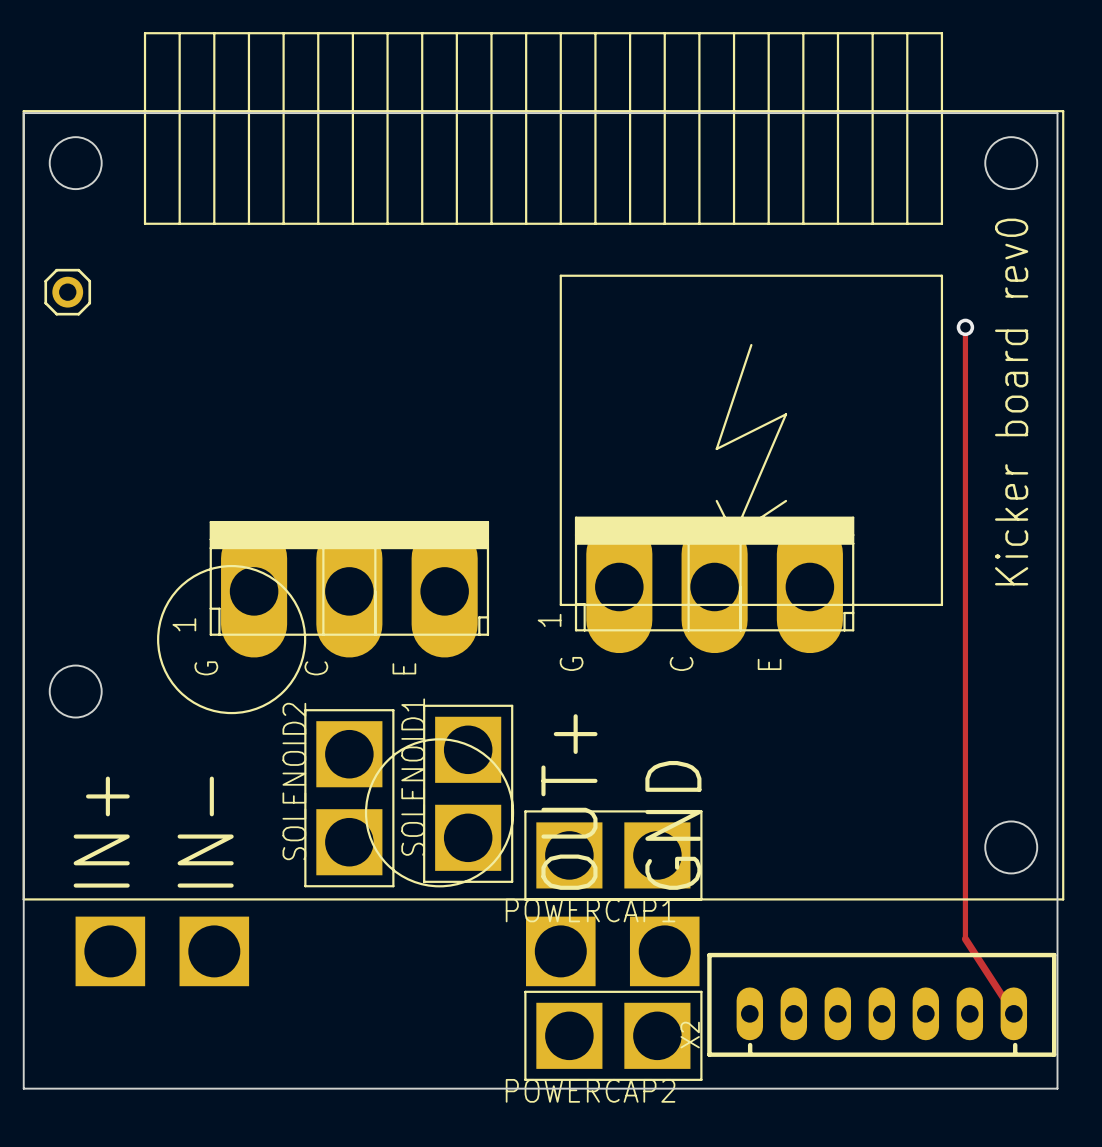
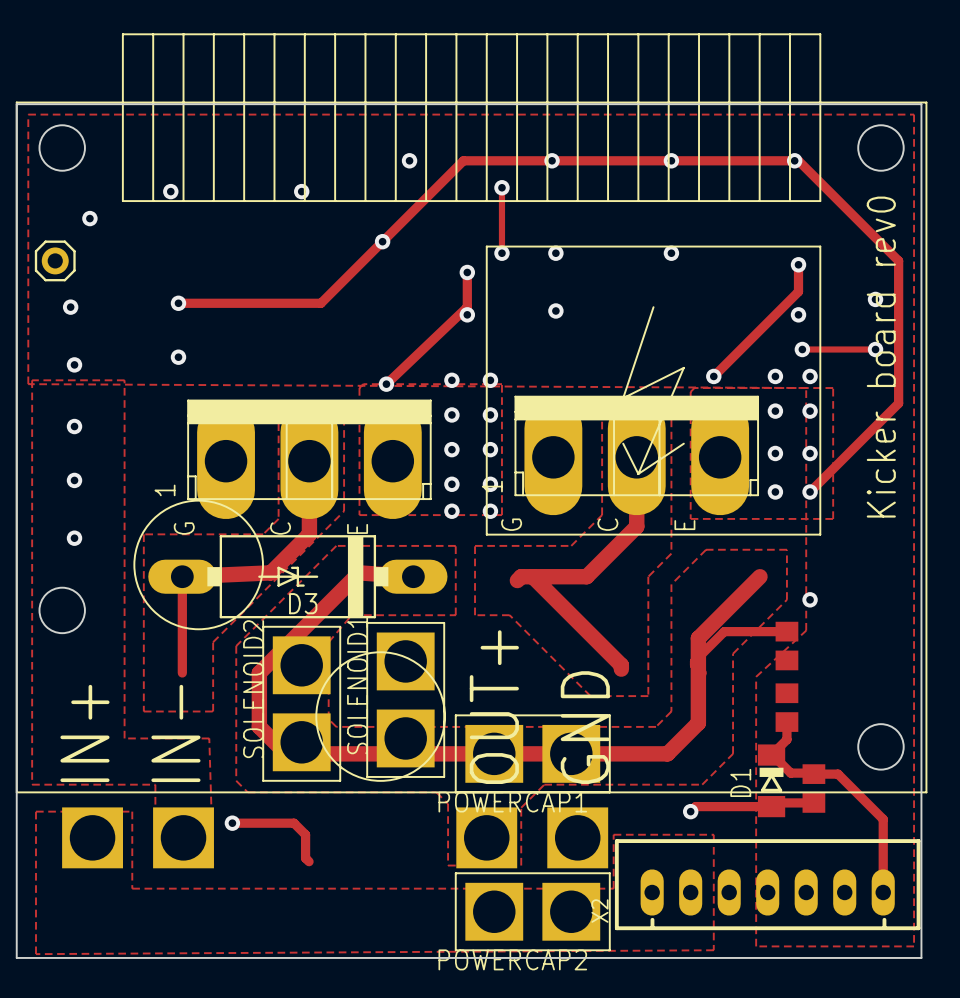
zone outline: none -> (28, 114) (914, 114) (914, 946) (756, 946) (756, 676) (806, 630) (806, 388) (28, 384) (28, 114)
via: none -> (409, 160)
via: none -> (552, 160)
via: none -> (671, 160)
via: none -> (794, 160)
track: none -> (501, 187) (501, 253)
via: none -> (501, 187)
via: none -> (170, 191)
via: none -> (301, 191)
via: none -> (89, 218)
via: none -> (382, 241)
via: none -> (501, 253)
via: none -> (555, 253)
via: none -> (671, 253)
track: none -> (798, 264) (798, 291) (713, 376)
via: none -> (798, 264)
track: none -> (467, 272) (467, 307) (386, 384)
via: none -> (467, 272)
track: (965, 327) (965, 939) (1013, 1013) -> none
via: (965, 327) -> none
via: none -> (875, 299)
track: none -> (178, 303) (320, 303) (463, 160) (798, 160) (898, 260) (898, 403) (810, 491)
via: none -> (178, 303)
via: none -> (70, 307)
via: none -> (555, 310)
via: none -> (467, 314)
via: none -> (798, 314)
track: none -> (802, 349) (875, 349)
via: none -> (802, 349)
via: none -> (875, 349)
via: none -> (178, 357)
via: none -> (74, 364)
via: none -> (713, 376)
via: none -> (775, 376)
via: none -> (810, 376)
zone outline: none -> (32, 380) (124, 380) (124, 738) (209, 738) (213, 865) (155, 865) (155, 784) (32, 784) (32, 380)
via: none -> (451, 380)
via: none -> (490, 380)
zone outline: none -> (363, 384) (501, 384) (501, 515) (359, 515) (359, 388) (363, 384)
via: none -> (386, 384)
zone outline: none -> (694, 388) (833, 388) (833, 518) (690, 518) (690, 391) (694, 388)
zone outline: none -> (602, 407) (671, 407) (671, 553) (648, 576) (648, 696) (590, 696) (509, 615) (475, 615) (475, 545) (571, 545) (602, 515) (602, 407)
zone outline: none -> (278, 411) (344, 411) (344, 511) (213, 642) (213, 711) (143, 711) (143, 534) (263, 534) (278, 518) (278, 411)
via: none -> (775, 411)
via: none -> (810, 411)
via: none -> (451, 414)
via: none -> (490, 414)
via: none -> (74, 426)
via: none -> (451, 449)
via: none -> (490, 449)
via: none -> (775, 453)
via: none -> (810, 453)
track: none -> (636, 457) (636, 526) (586, 576) (521, 576) (517, 580)
via: none -> (74, 480)
via: none -> (451, 484)
via: none -> (490, 484)
via: none -> (775, 491)
via: none -> (810, 491)
track: none -> (309, 507) (309, 534) (270, 572) (182, 576) (170, 572)
via: none -> (451, 511)
via: none -> (490, 511)
part position: (714, 584) -> (636, 455)
part position: (349, 589) -> (309, 459)
via: none -> (74, 538)
zone outline: none -> (336, 545) (455, 545) (455, 615) (351, 615) (328, 642) (328, 719) (336, 726) (656, 726) (671, 711) (671, 584) (706, 549) (786, 549) (786, 599) (733, 653) (733, 753) (702, 784) (544, 784) (521, 807) (521, 865) (448, 865) (448, 803) (436, 792) (247, 792) (236, 780) (236, 646) (336, 545)
D3: none -> (297, 576)
track: none -> (413, 576) (359, 572) (259, 672) (259, 726) (286, 753) (667, 753) (698, 723) (698, 638) (760, 576)
track: none -> (532, 576) (621, 665) (621, 669)
track: none -> (182, 584) (182, 672)
via: none -> (810, 599)
track: none -> (786, 631) (724, 631) (694, 661) (694, 665) (702, 672)
part: none -> (786, 646)
part: none -> (786, 707)
track: none -> (786, 722) (786, 739) (771, 755) (790, 773) (838, 774) (883, 819) (883, 880)
D1: none -> (771, 780)
part: none -> (813, 788)
track: none -> (813, 802) (775, 802) (771, 806) (695, 806) (690, 811)
zone outline: none -> (35, 811) (132, 811) (132, 888) (613, 888) (613, 834) (713, 834) (713, 950) (35, 954) (35, 811)
via: none -> (690, 811)
track: none -> (232, 823) (294, 823) (305, 834) (305, 858) (309, 861)
via: none -> (232, 823)

